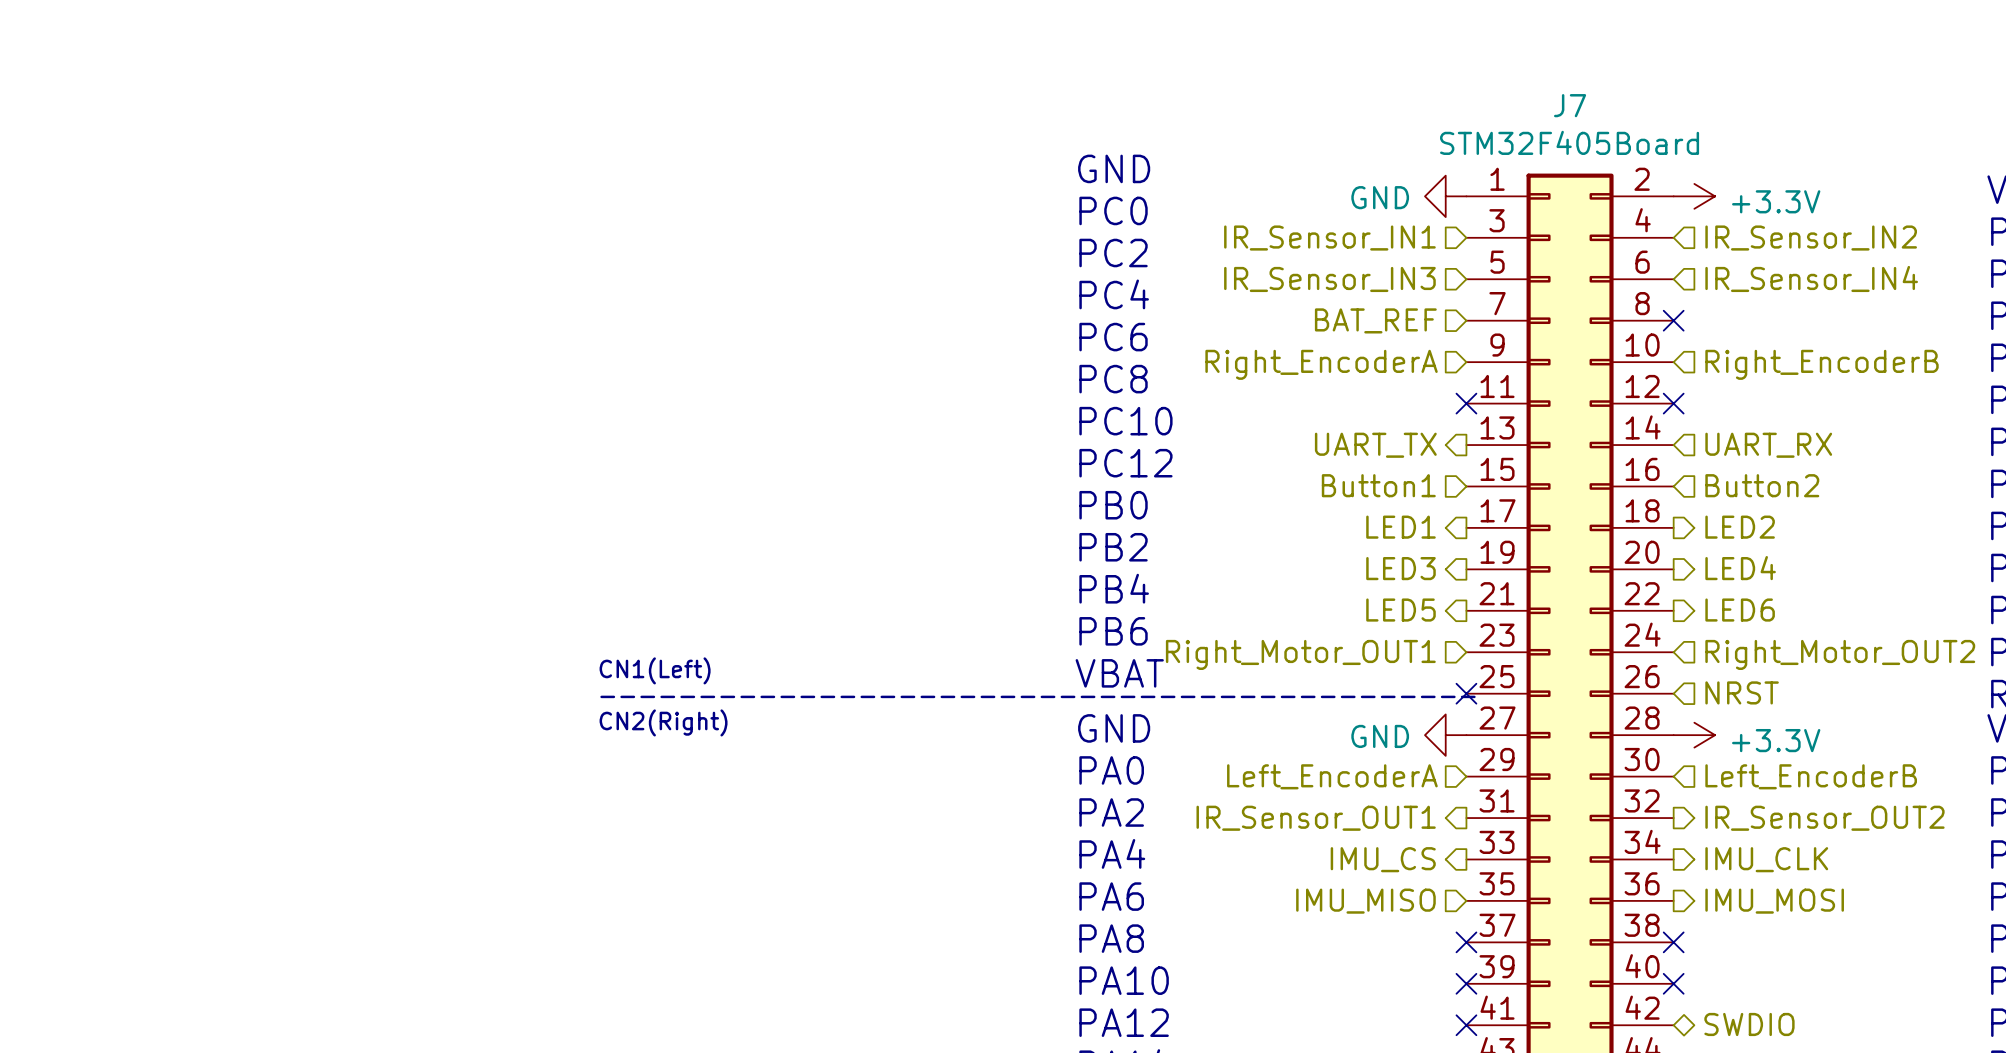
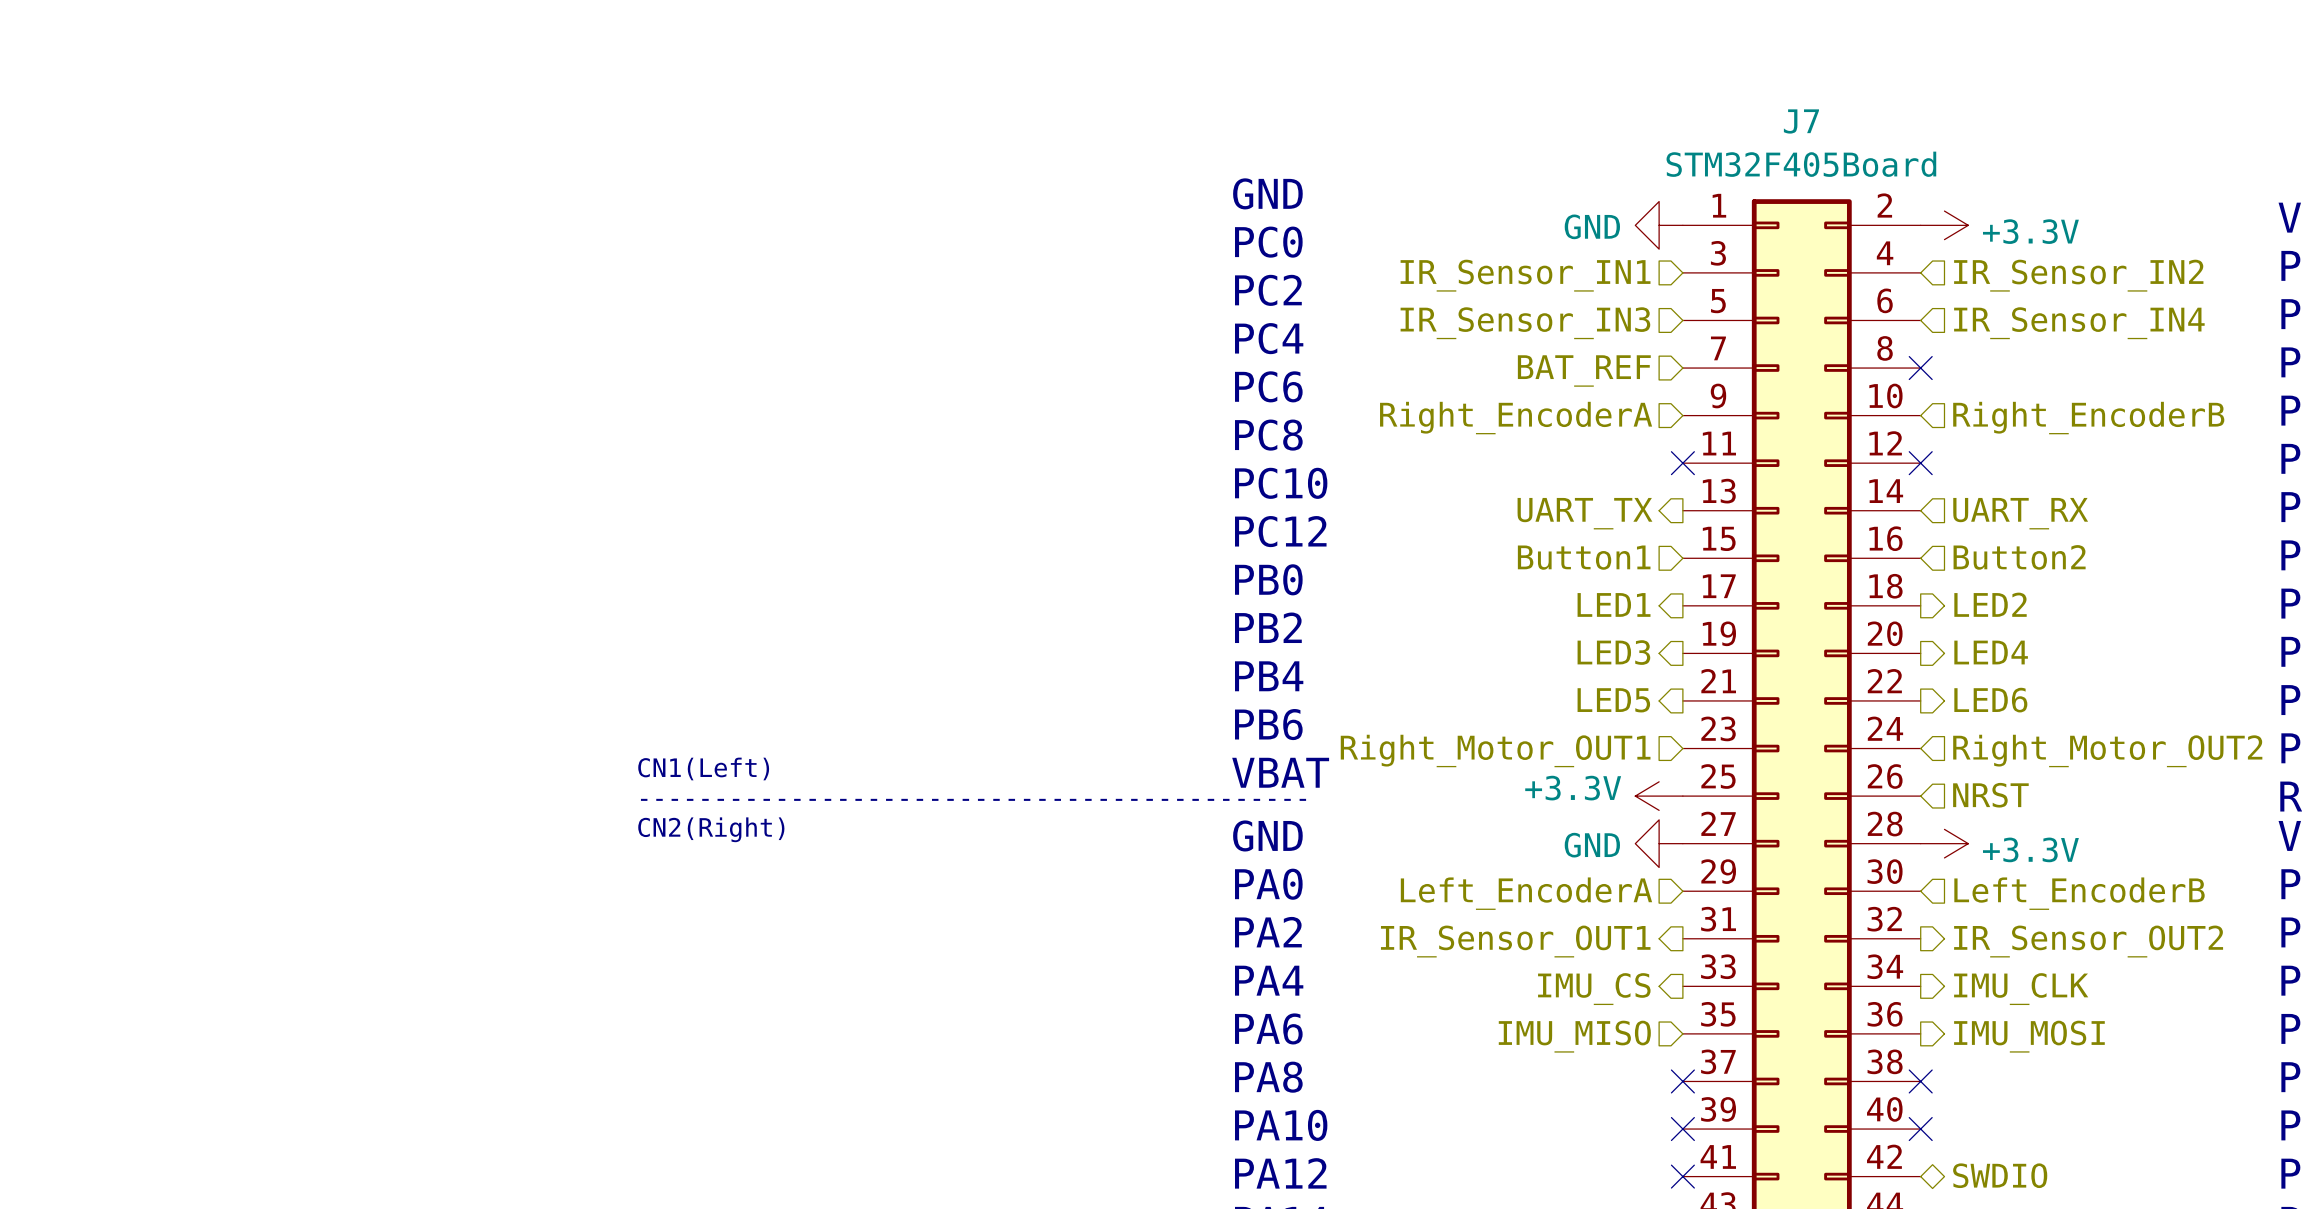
text position: CN1(Left) (655, 670) -> CN1(Left) (703, 768)
power symbol: none -> +3.3V (1659, 796)
no-connect mark: (1466, 693) -> none
text position: -------------------------------------------- (1038, 696) -> -------------------------------------------- (973, 799)
text position: CN2(Right) (663, 722) -> CN2(Right) (711, 829)

